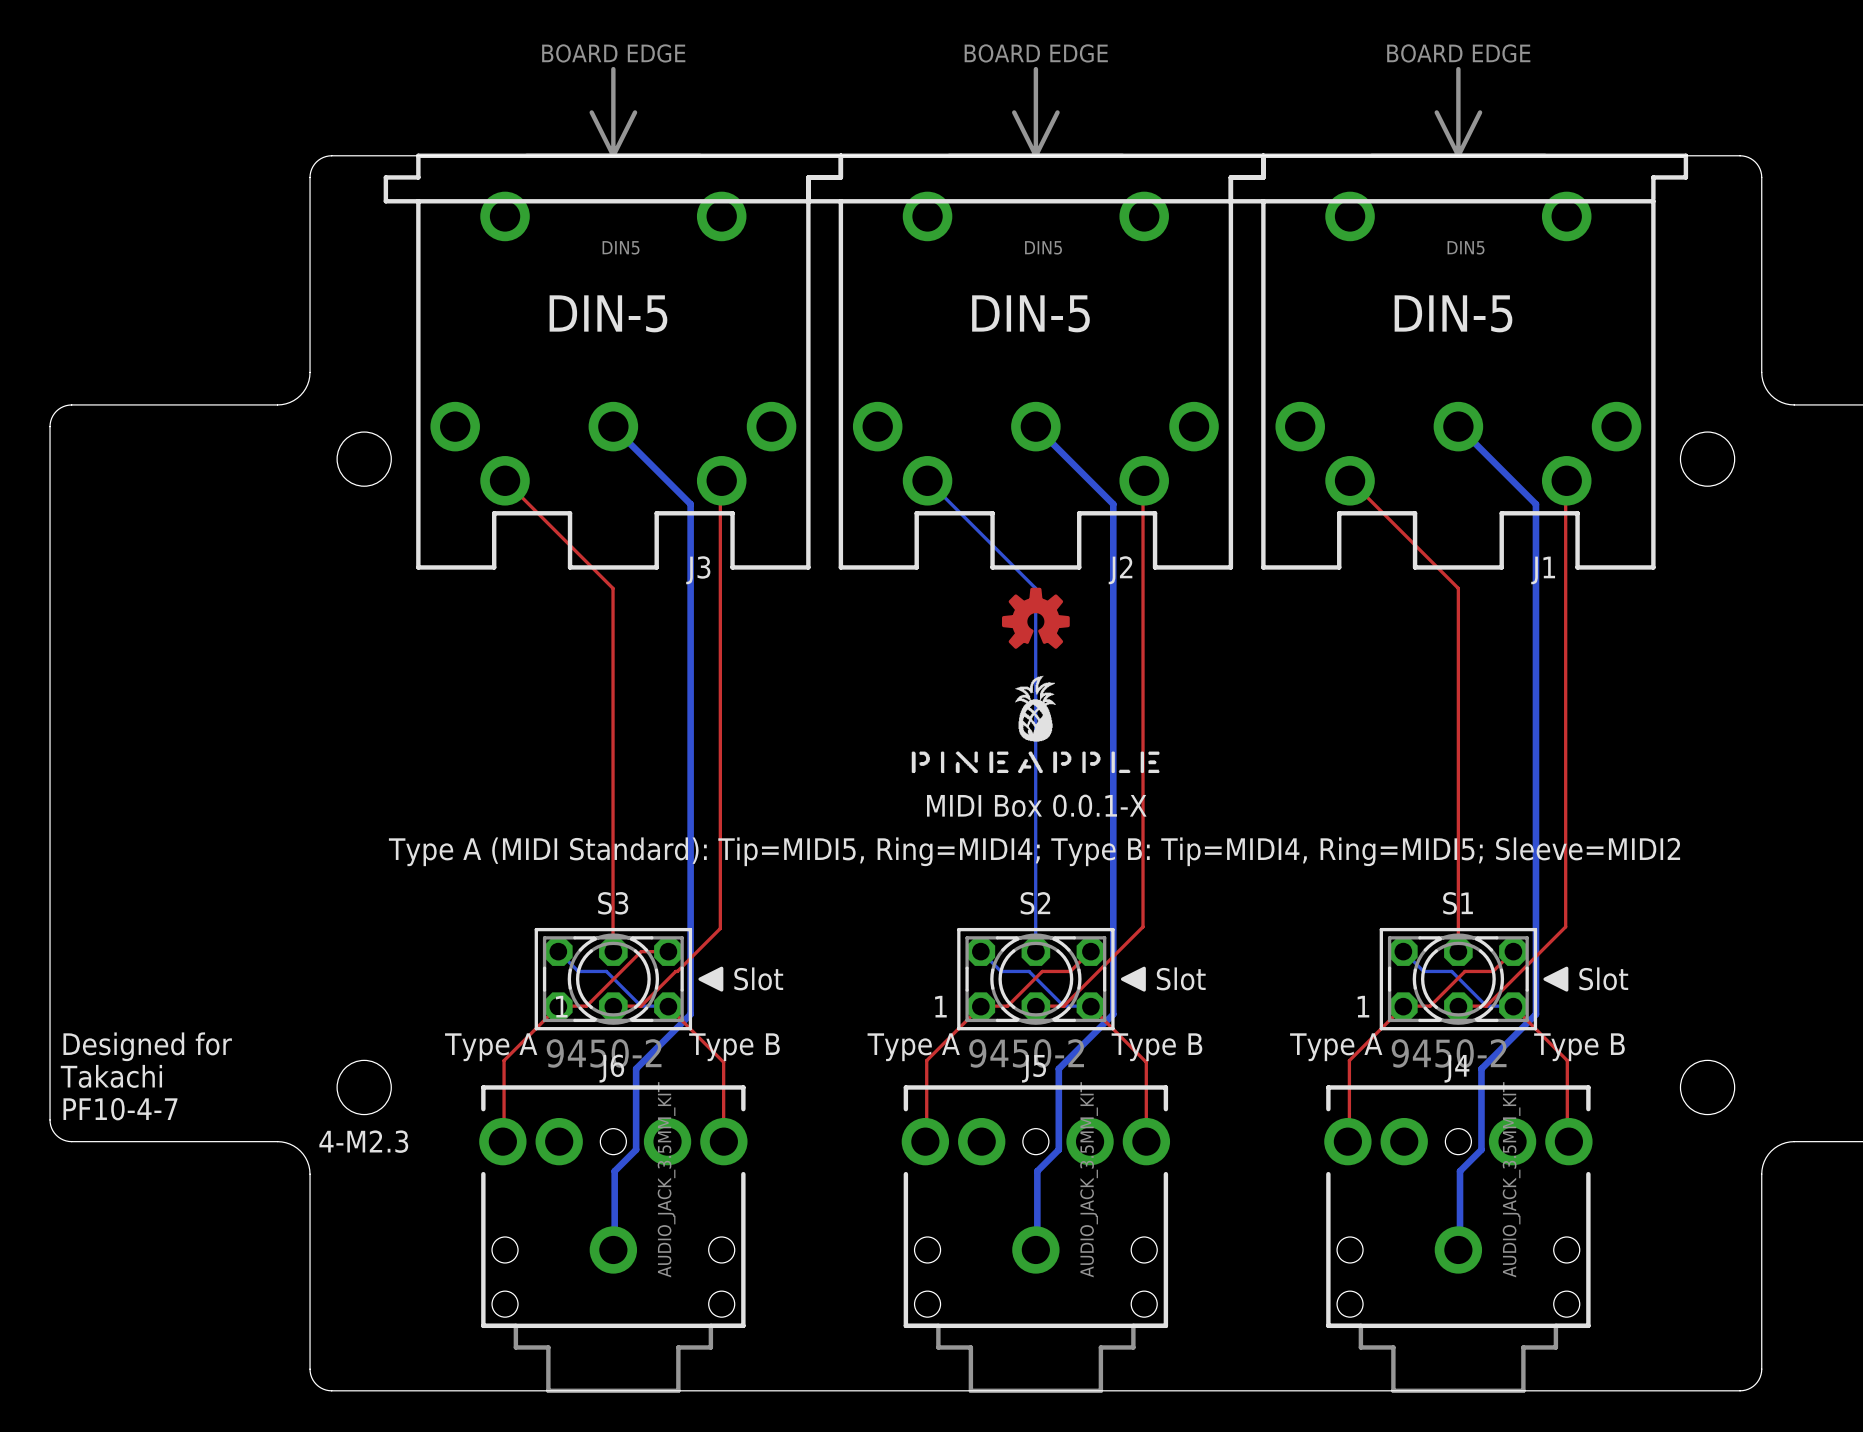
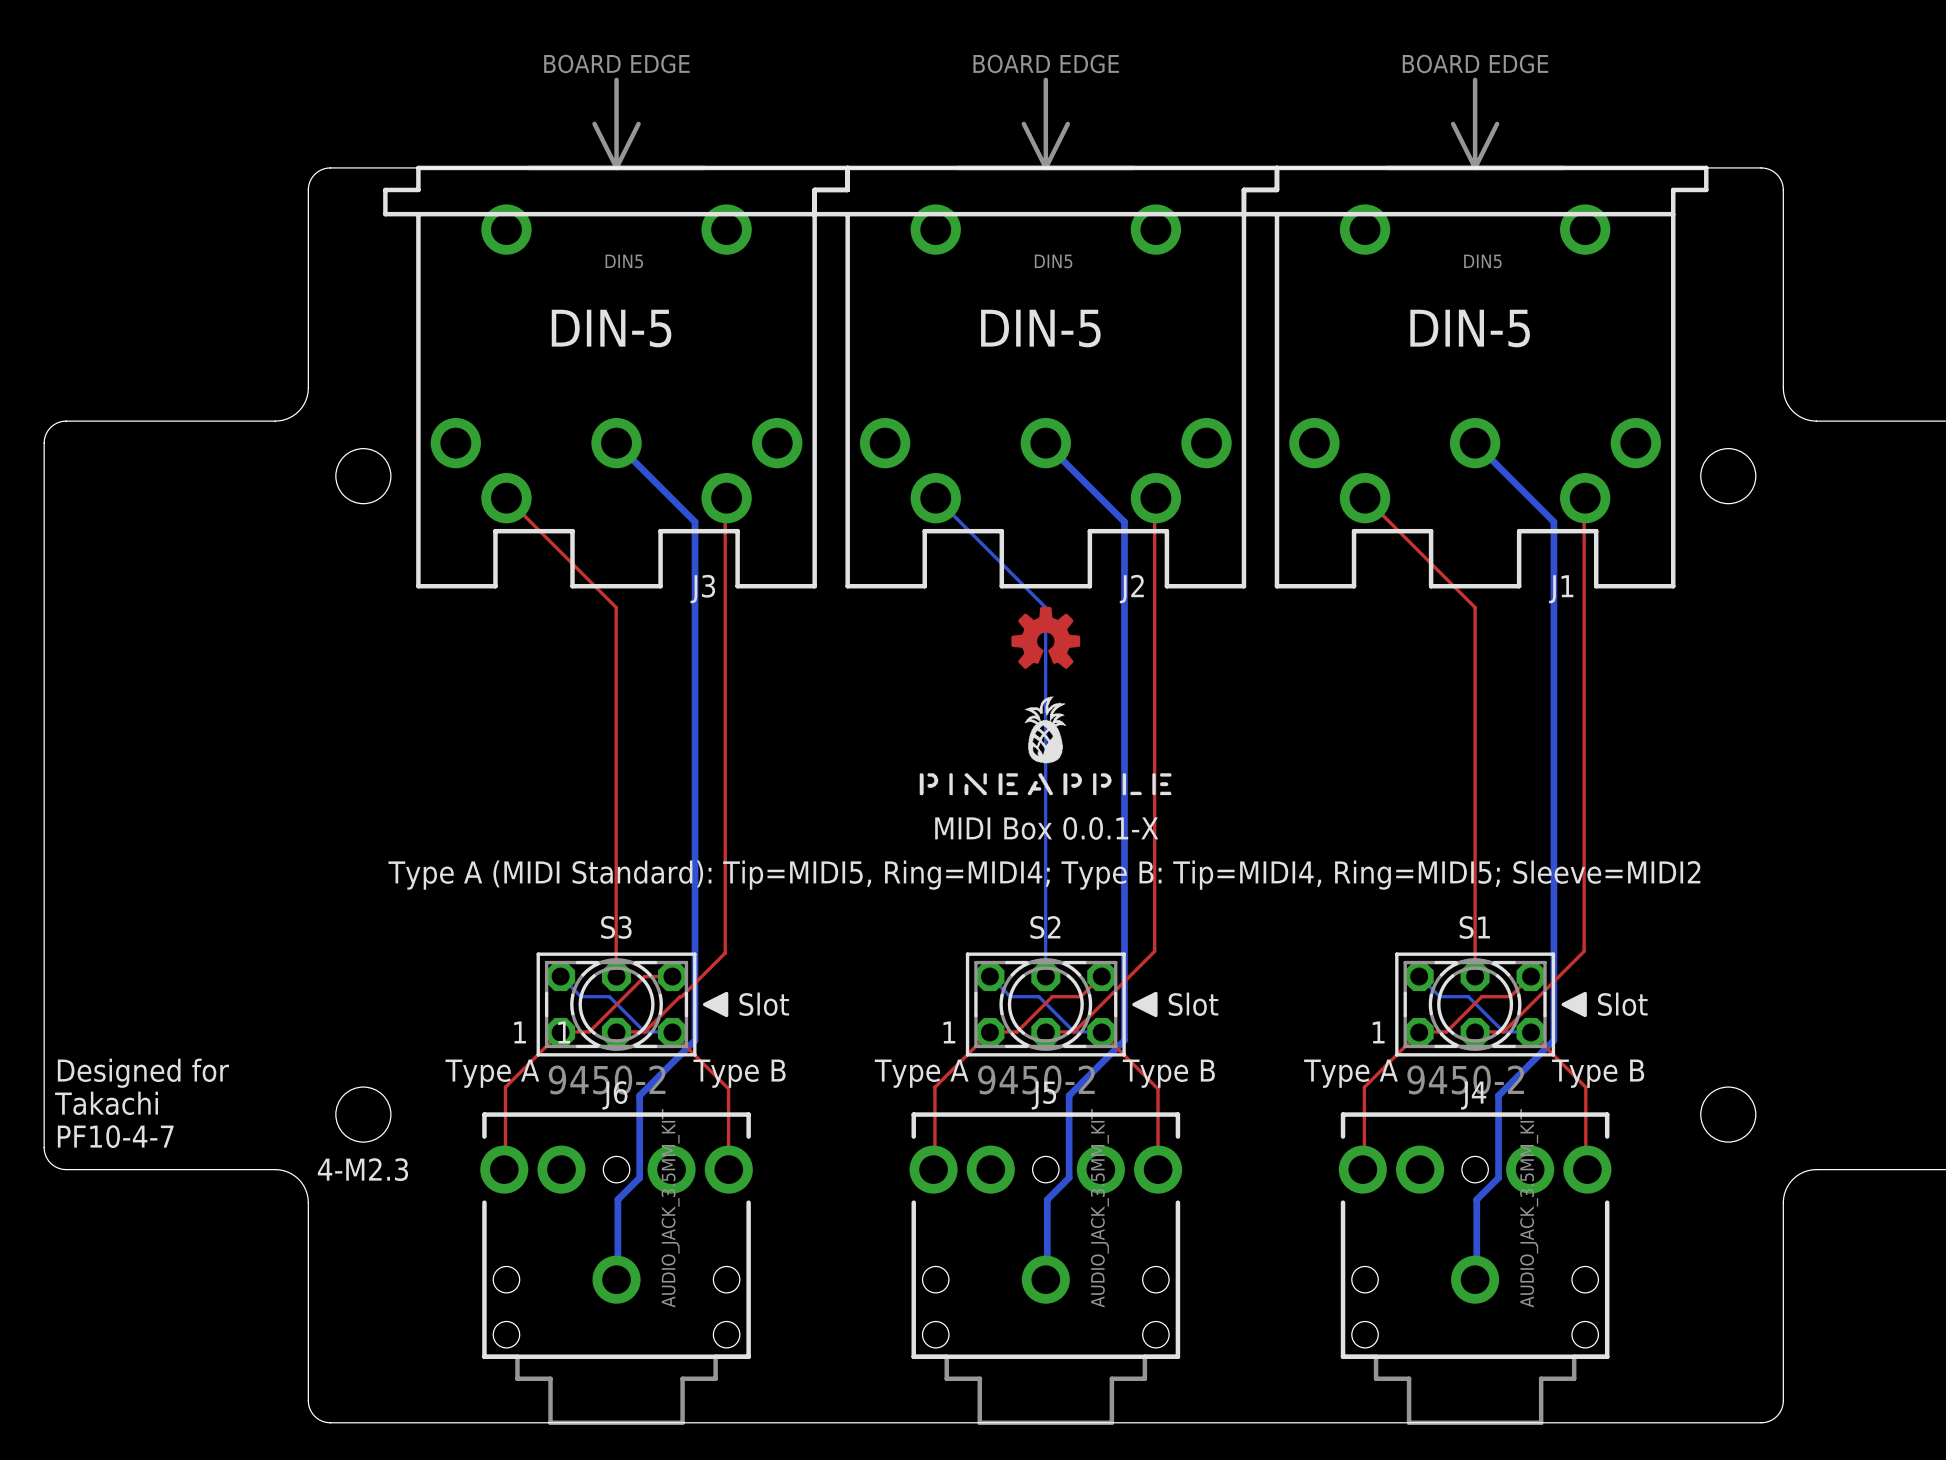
text: none -> 1 (520, 1032)

